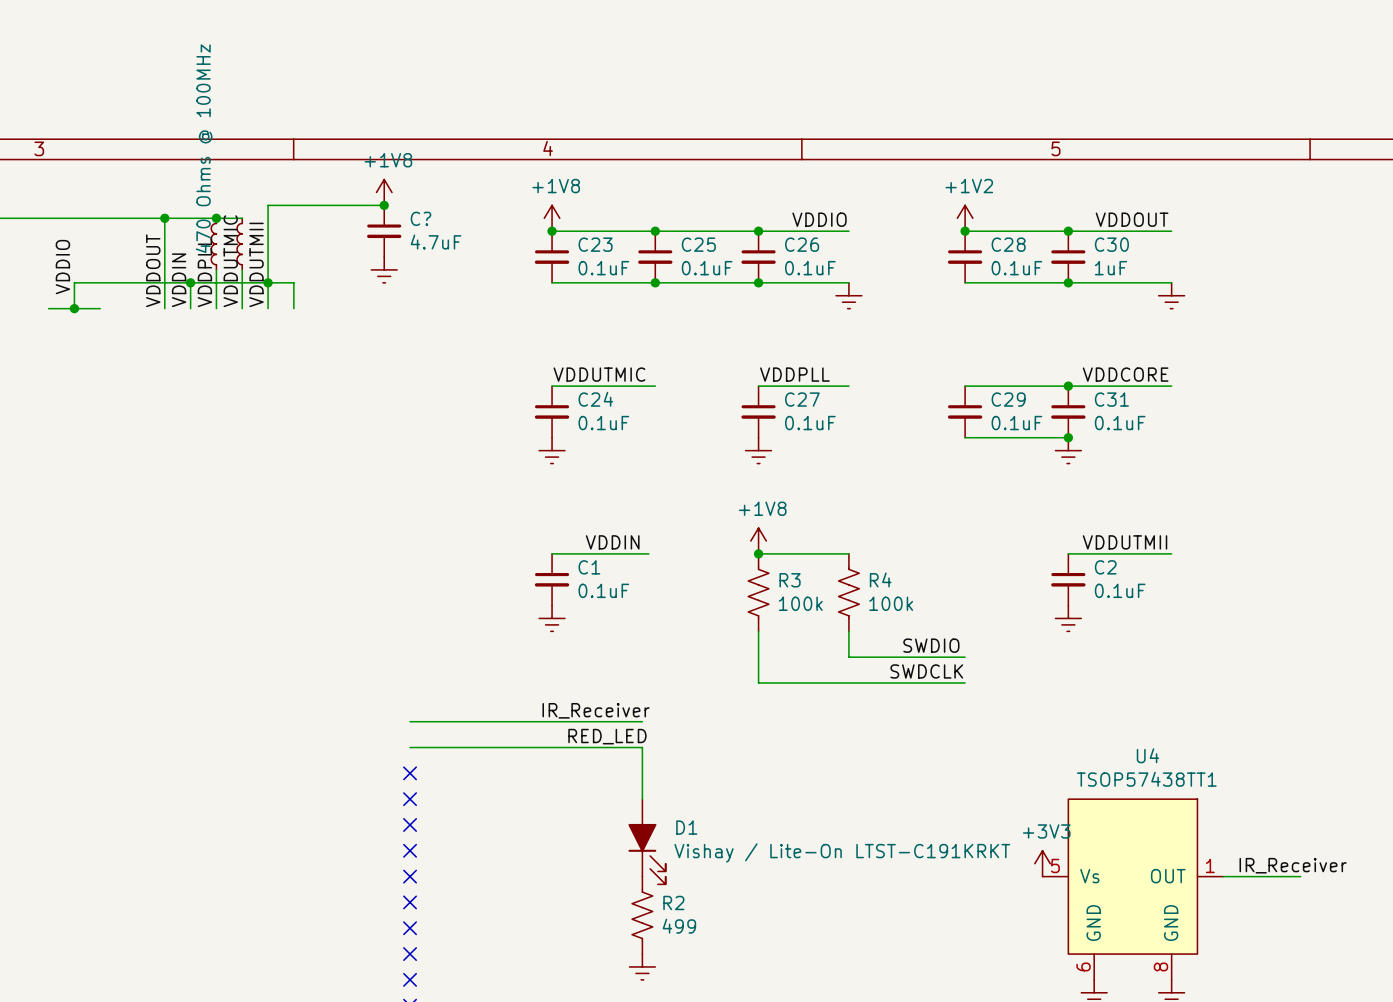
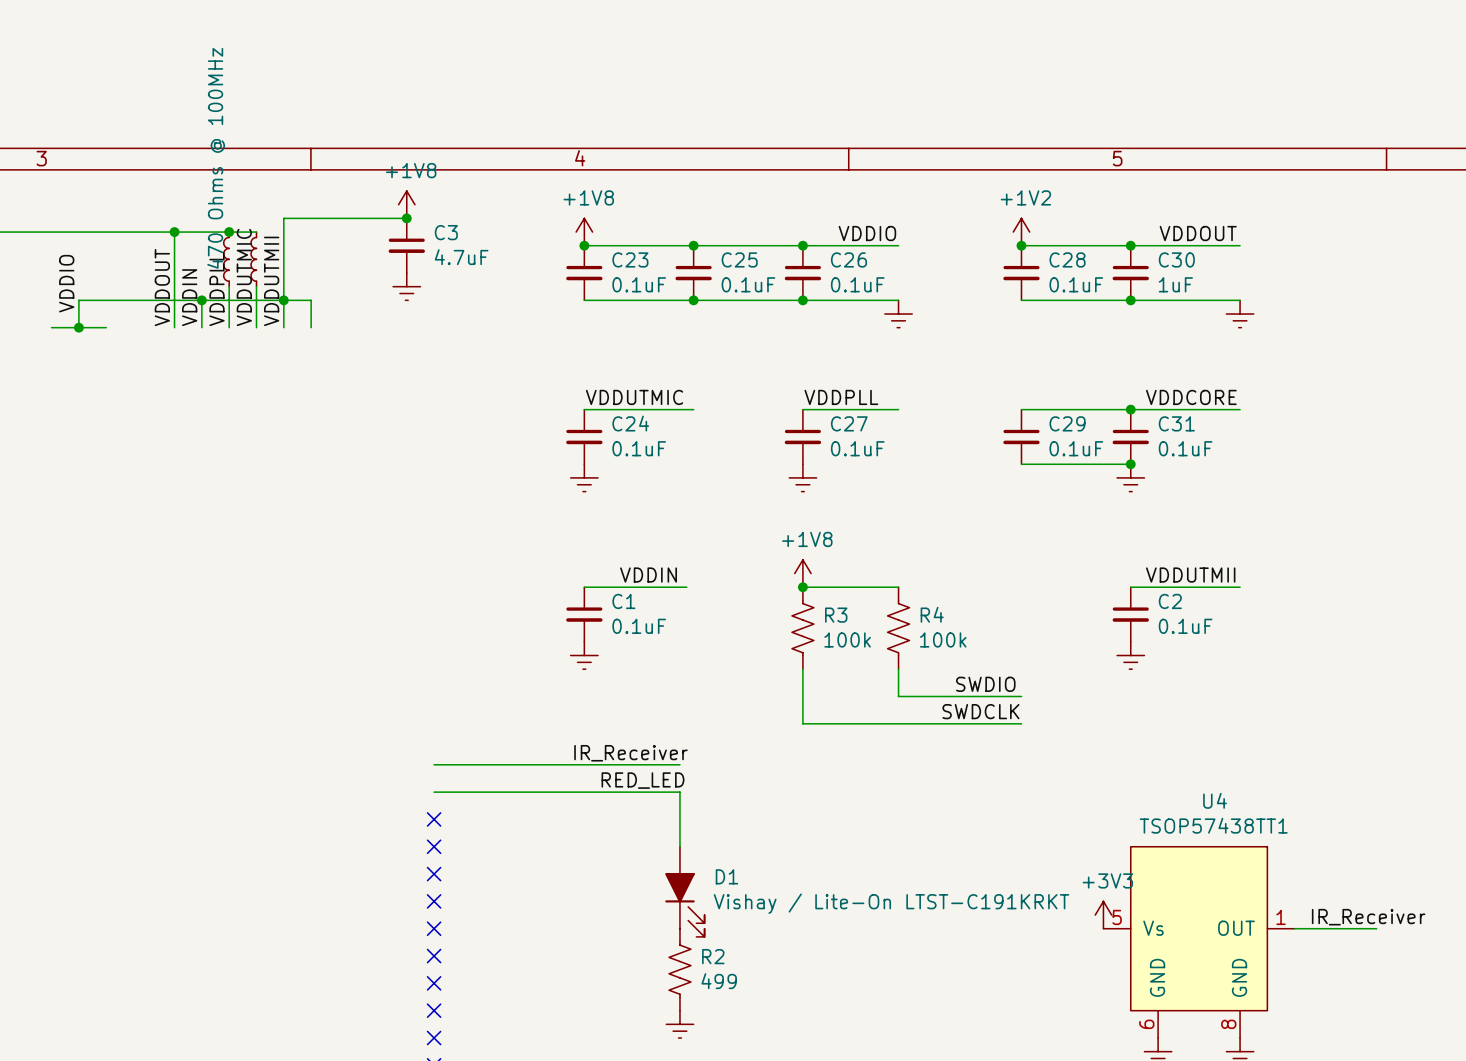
C? name: C? (420, 218) -> C3 (446, 232)

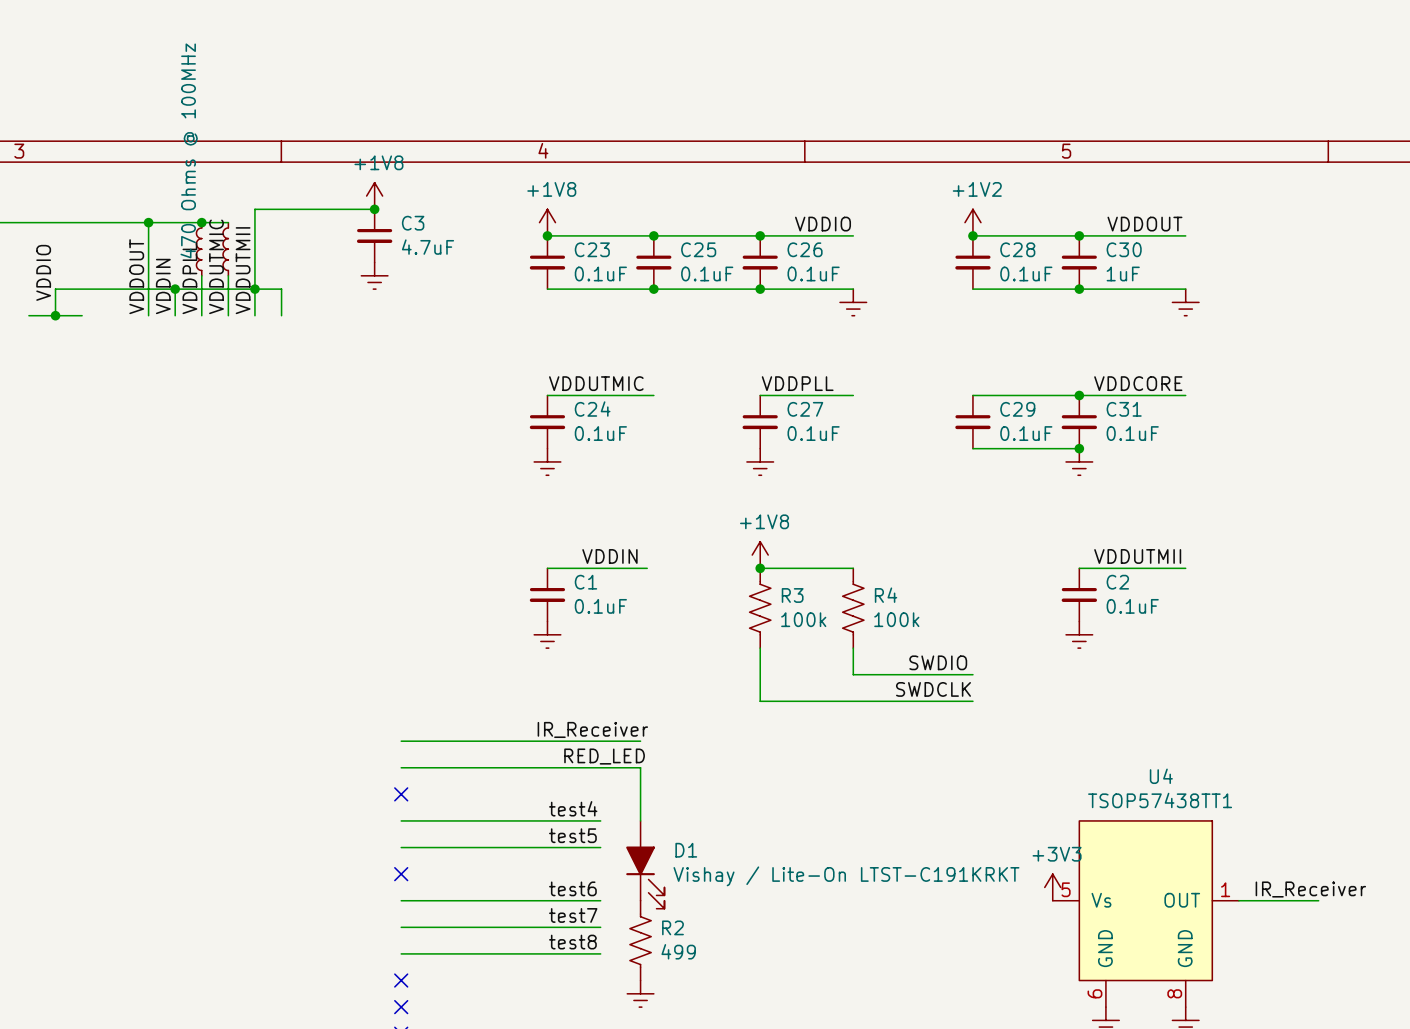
label: none -> test4 (573, 808)
wire: none -> (401, 820) (600, 820)
no-connect mark: (434, 846) -> none
label: none -> test5 (572, 835)
wire: none -> (401, 847) (600, 847)
no-connect mark: (434, 874) -> none
label: none -> test6 (572, 888)
wire: none -> (401, 900) (600, 900)
no-connect mark: (434, 928) -> none
label: none -> test7 (573, 915)
wire: none -> (401, 927) (600, 927)
no-connect mark: (434, 956) -> none
label: none -> test8 (572, 942)
wire: none -> (401, 953) (600, 953)
no-connect mark: (434, 983) -> none

